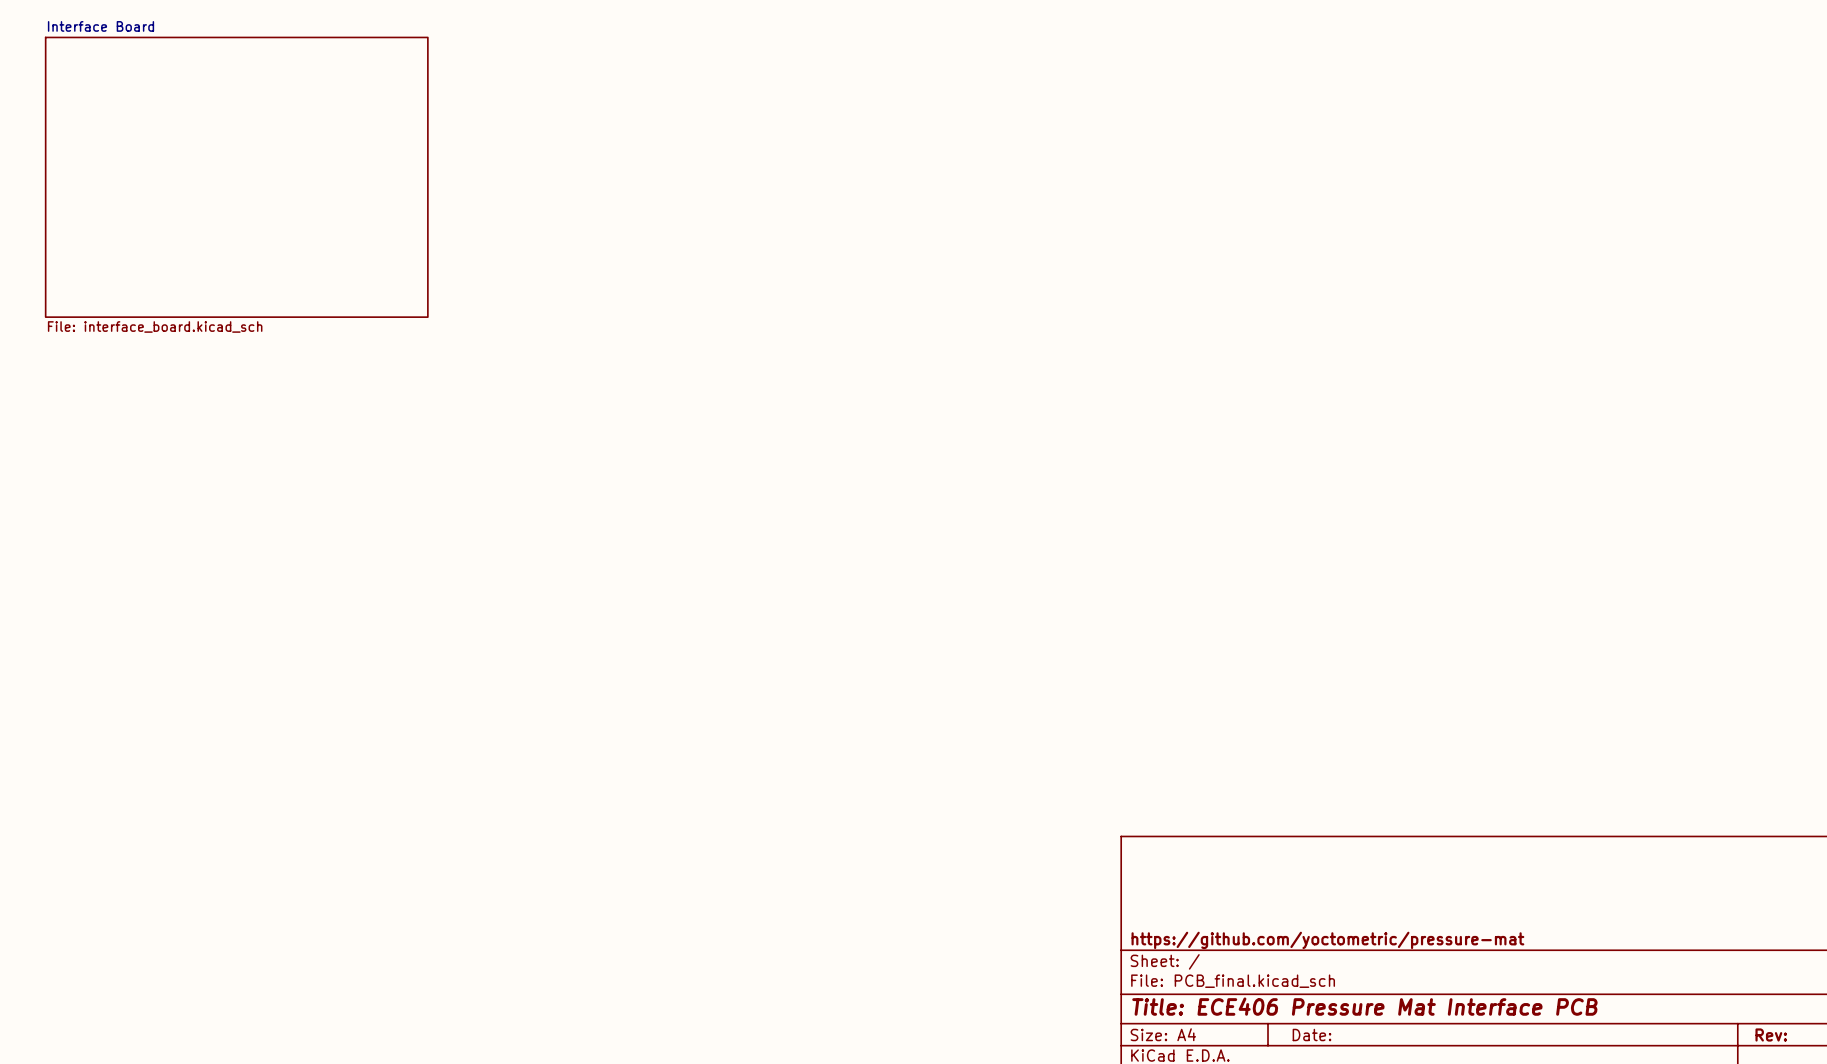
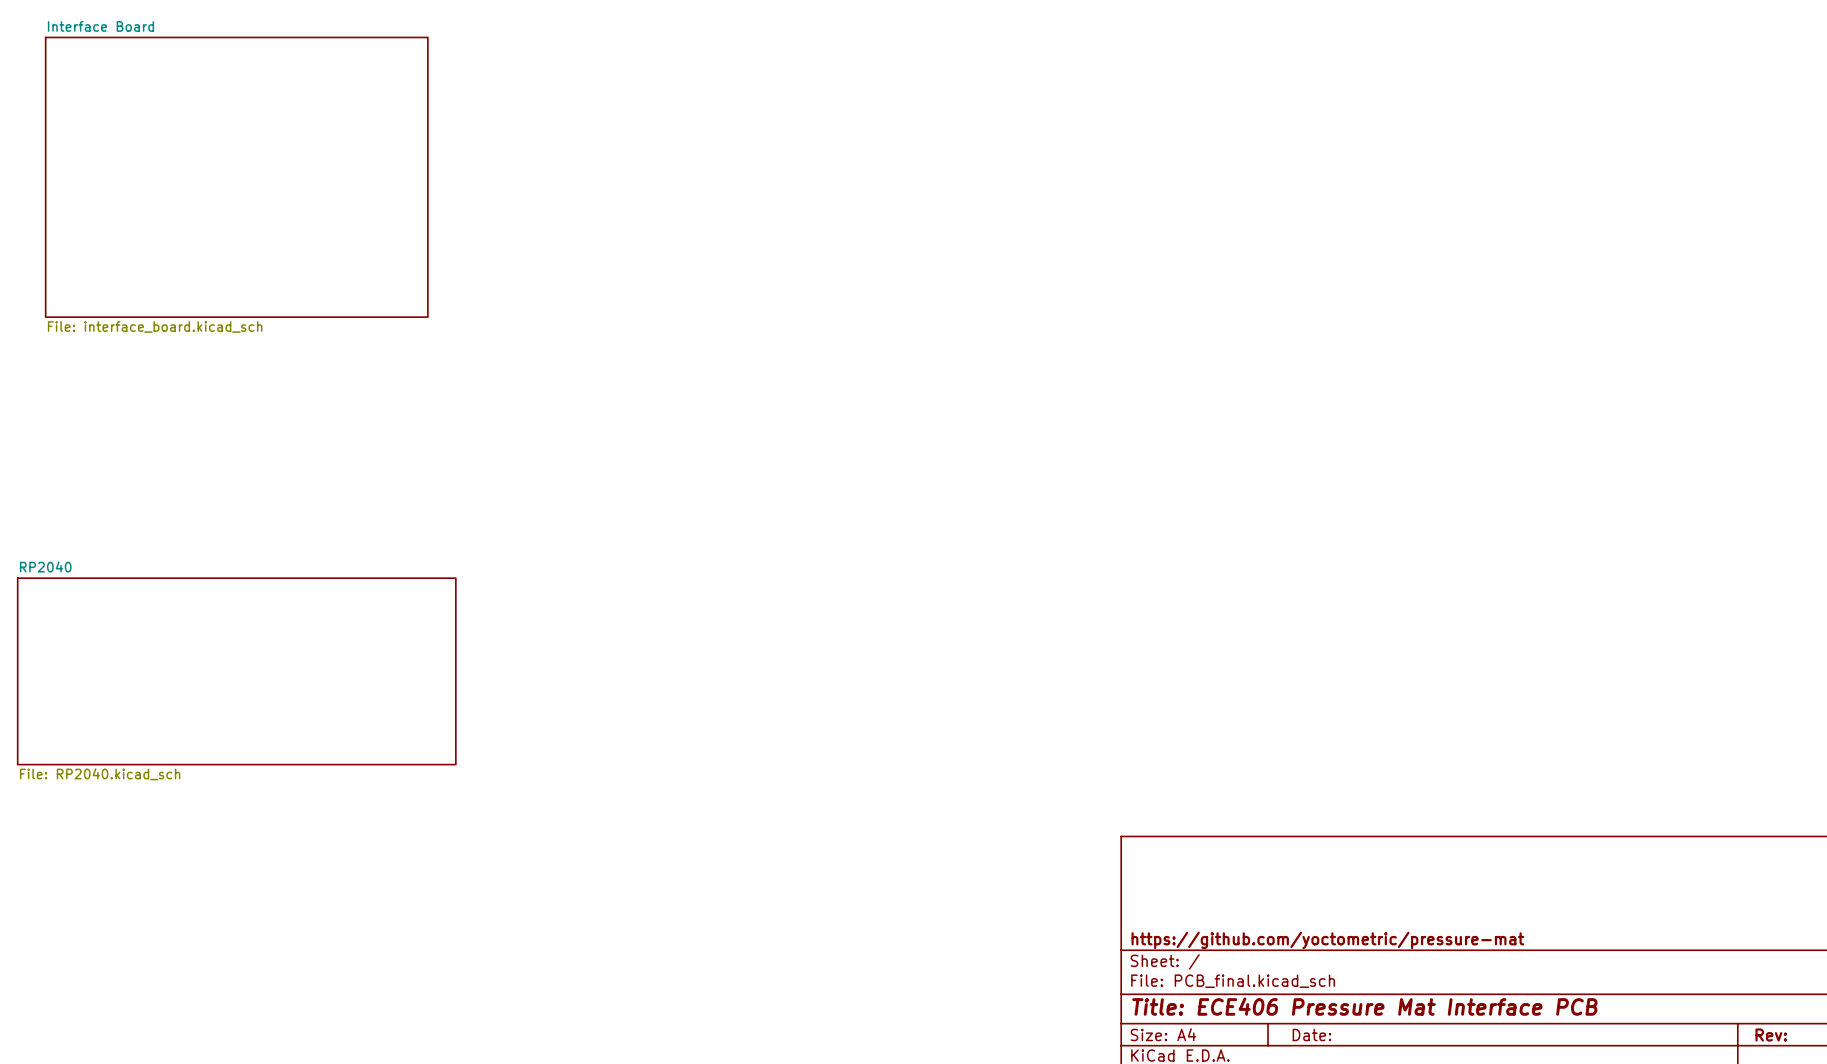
sheet RP2040: none -> File: RP2040.kicad_sch (236, 671)

